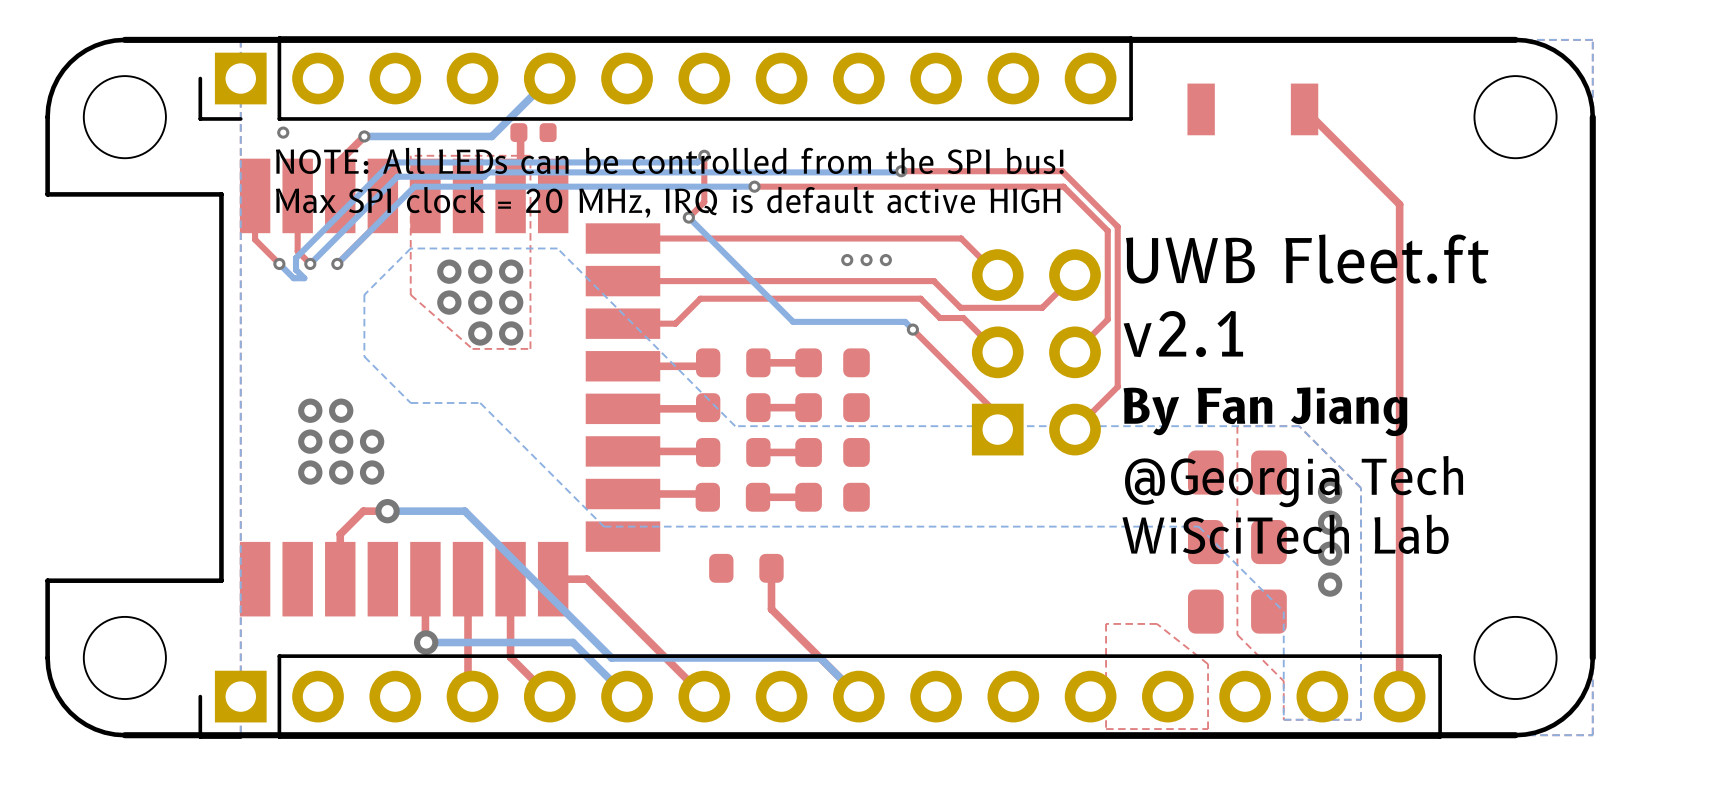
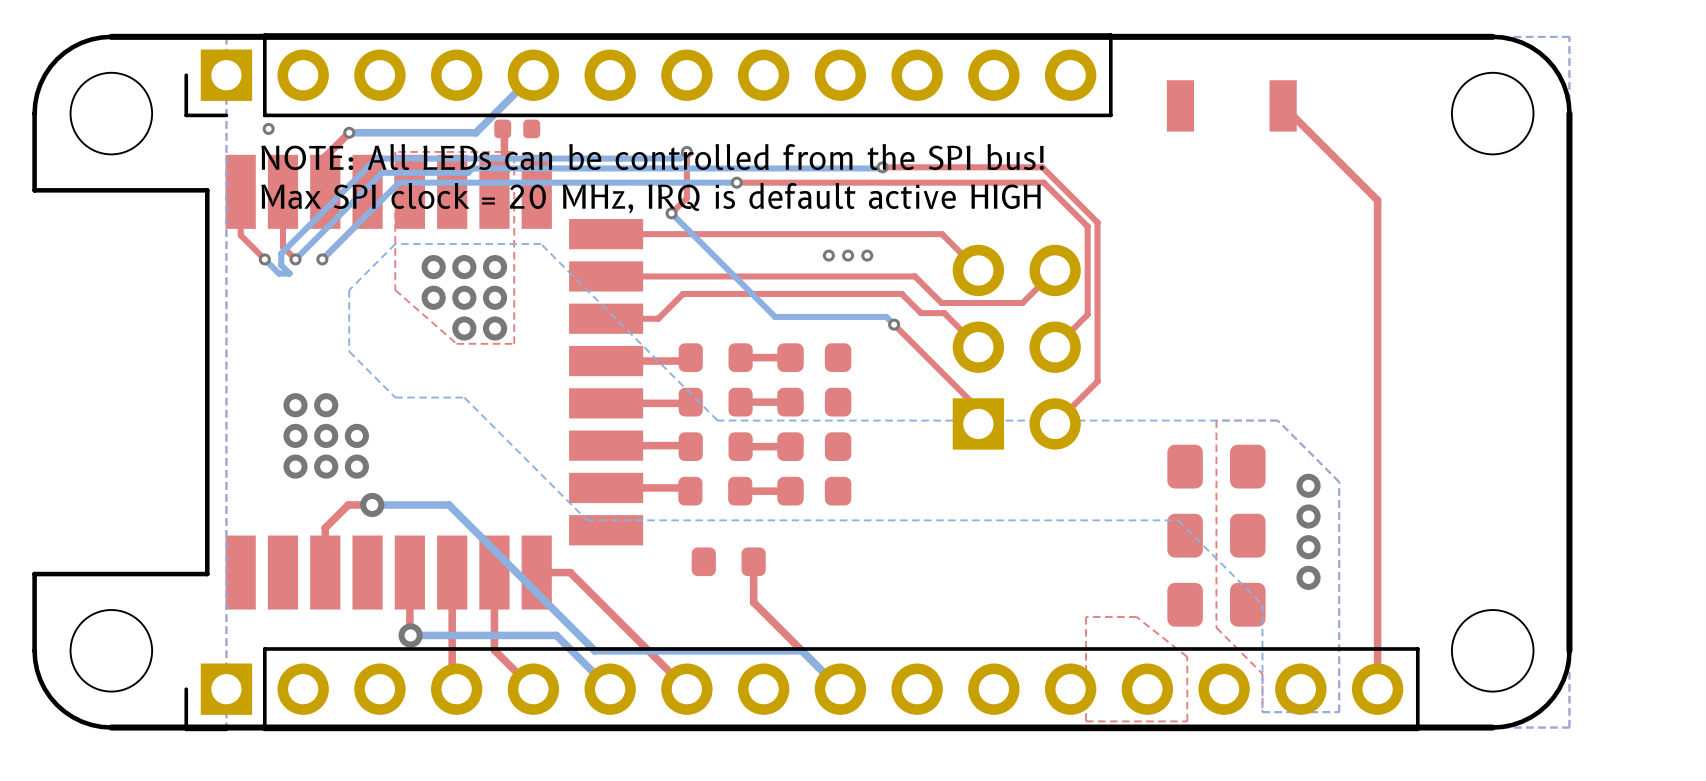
text: UWB Fleet.ft (1307, 259) -> none
text: v2.1 (1183, 334) -> none
text: By Fan Jiang (1265, 411) -> none
text: @Georgia Tech (1294, 481) -> none
text: WiSciTech Lab (1285, 534) -> none

